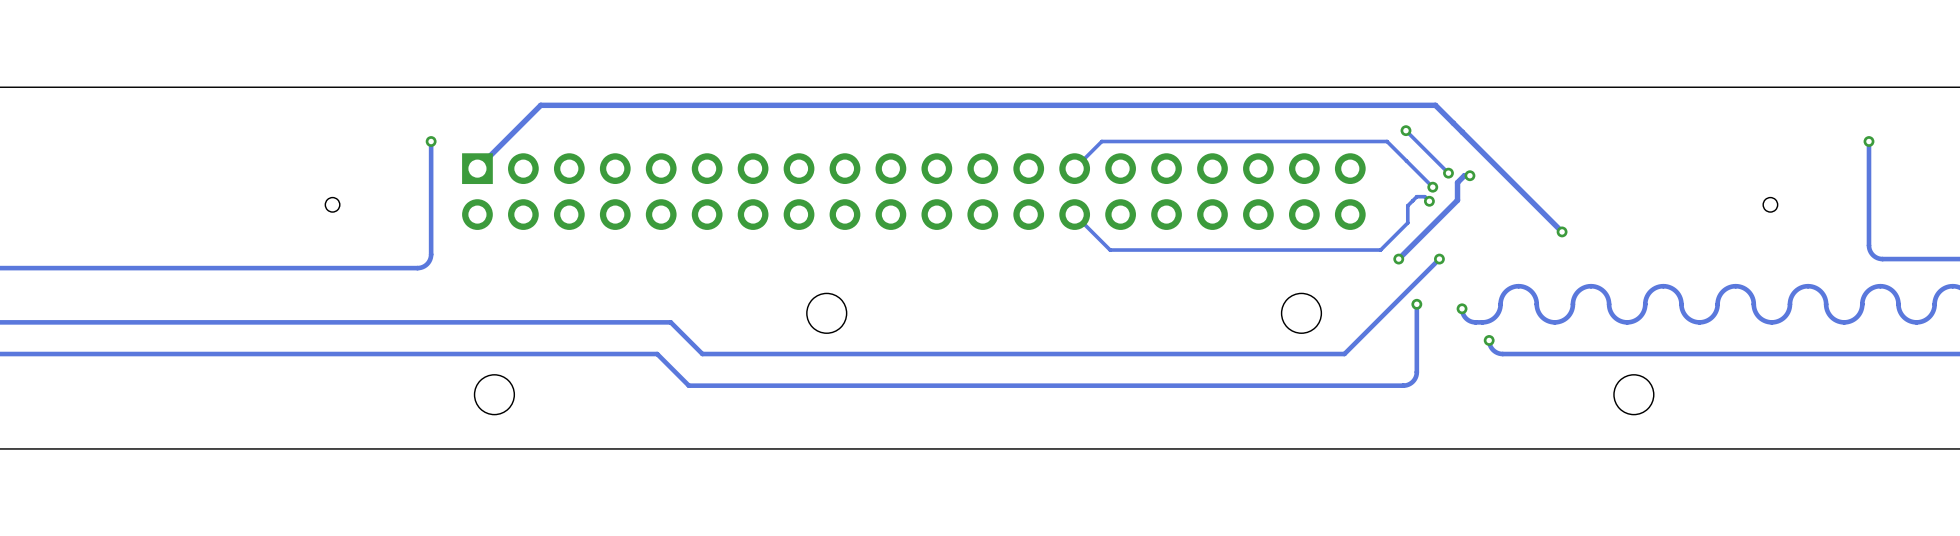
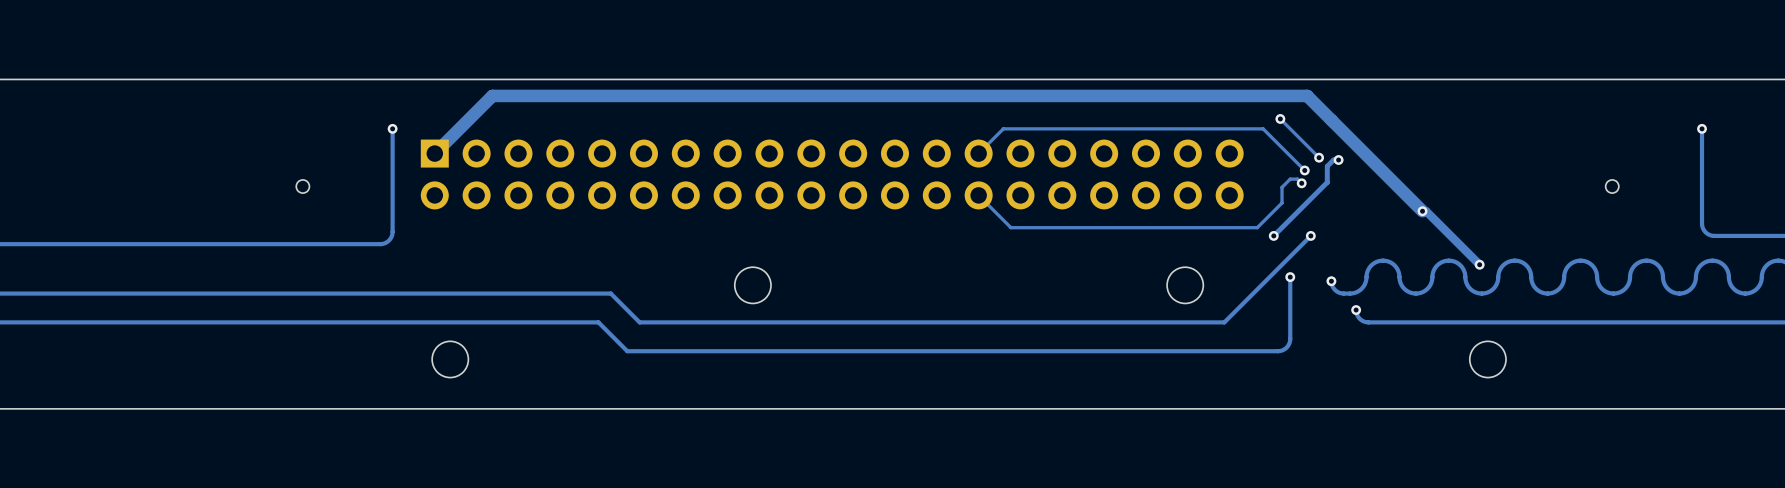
track width: thin (477, 168) (540, 105) (1435, 105) (1562, 231) -> thick (434, 153) (492, 95) (1307, 95) (1422, 211)
track: none -> (1422, 211) (1426, 211) (1479, 264)
via: none -> (1479, 264)

